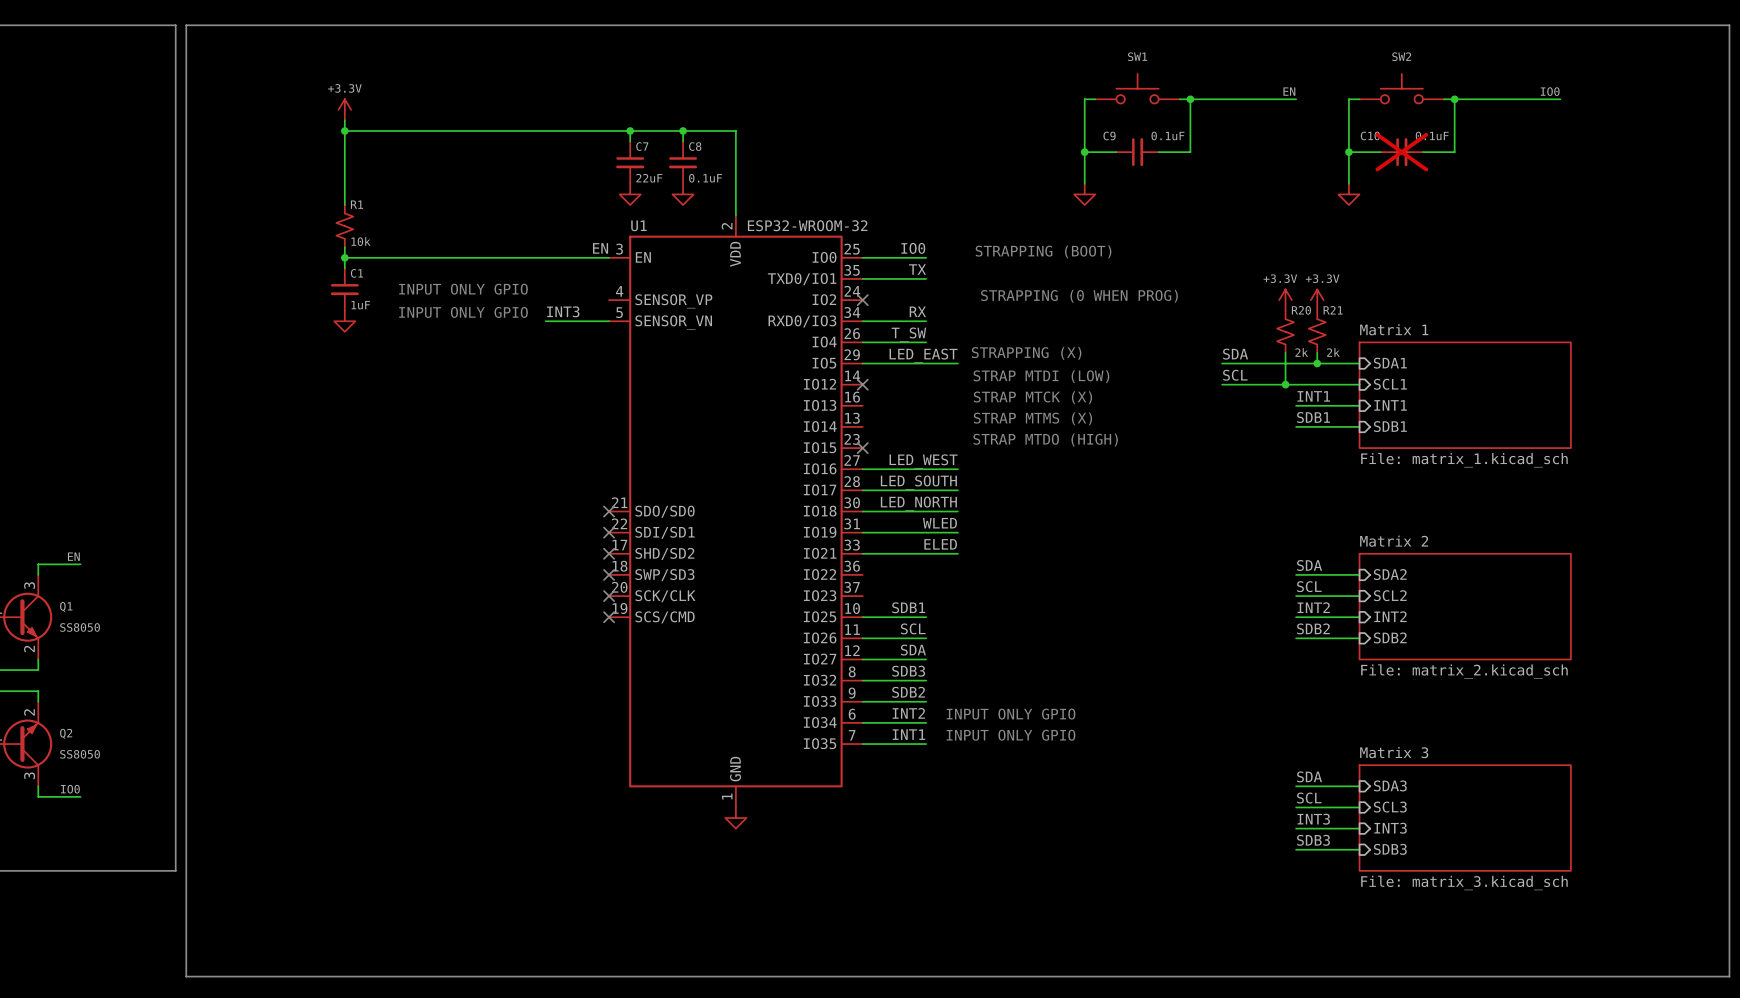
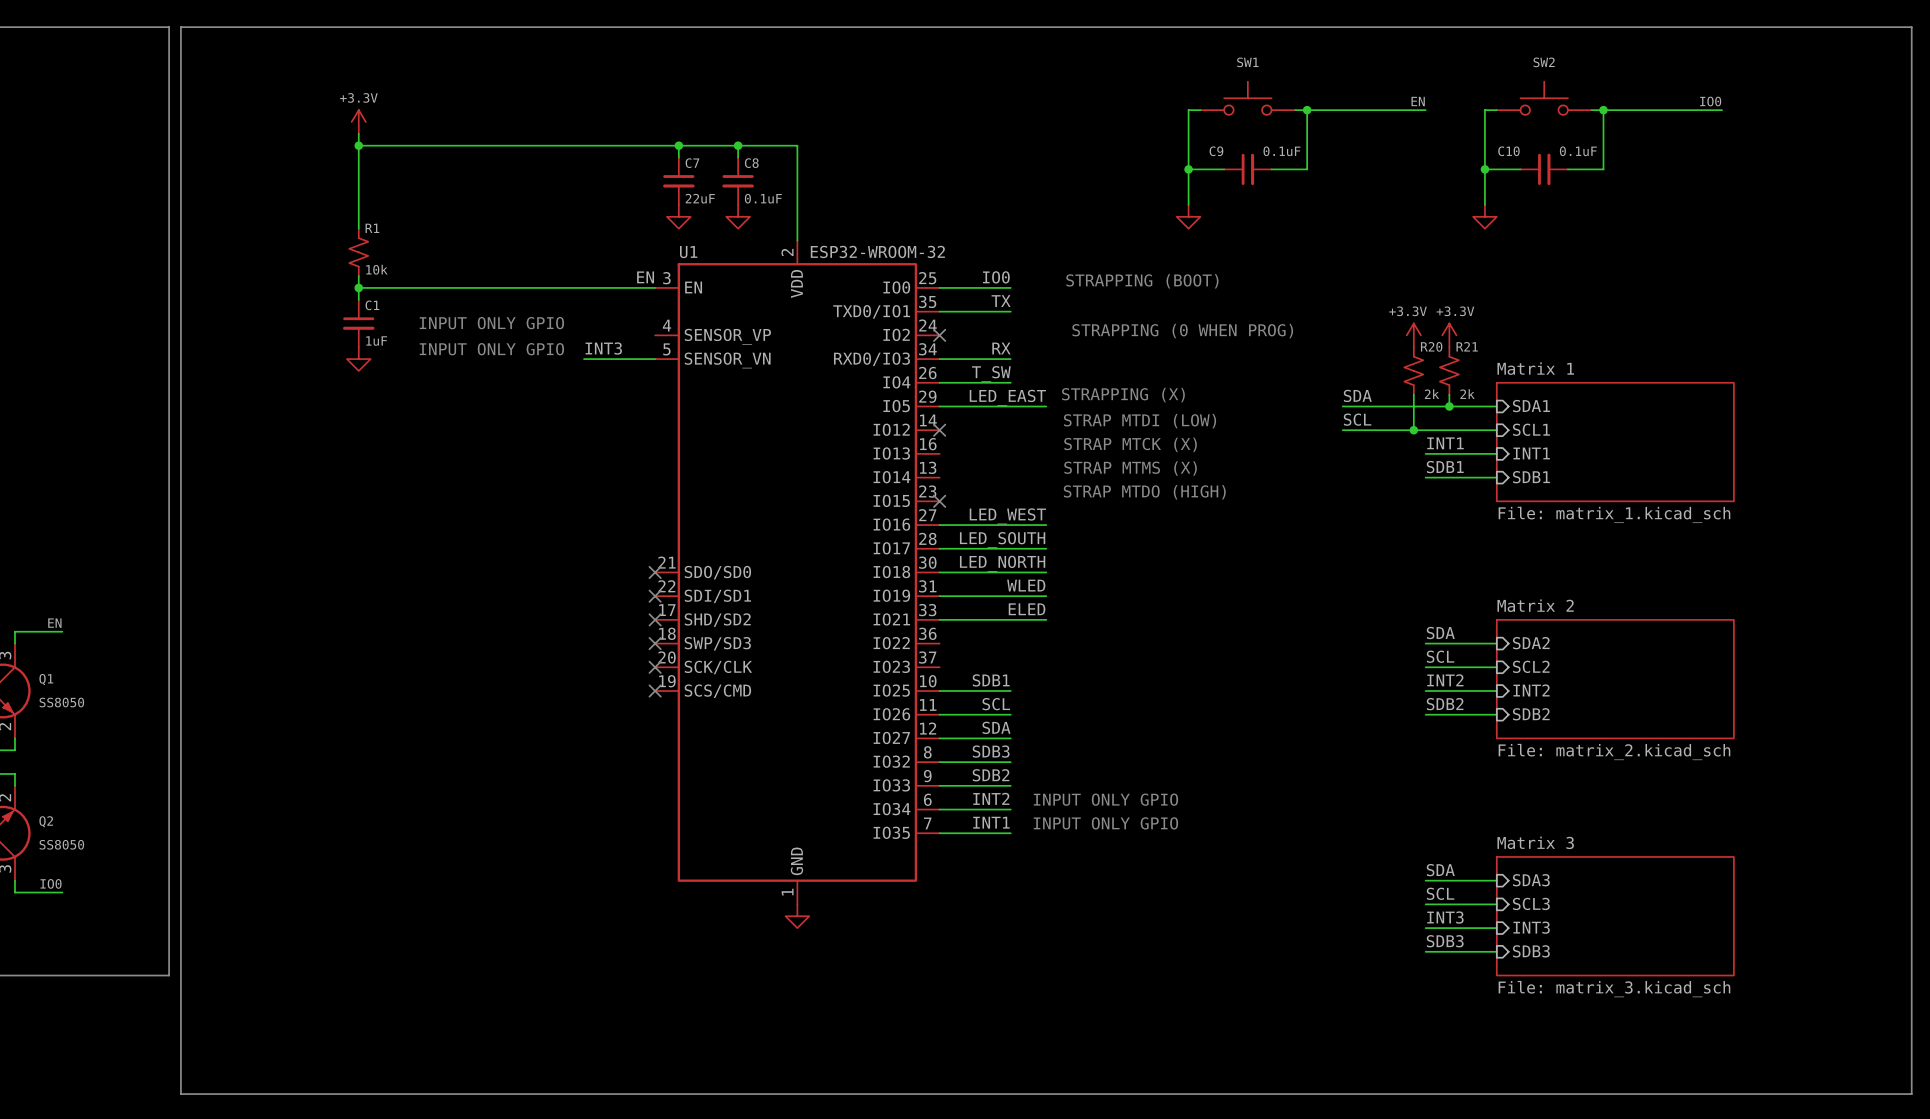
C10 do-not-place cross: (1401, 152) -> none

